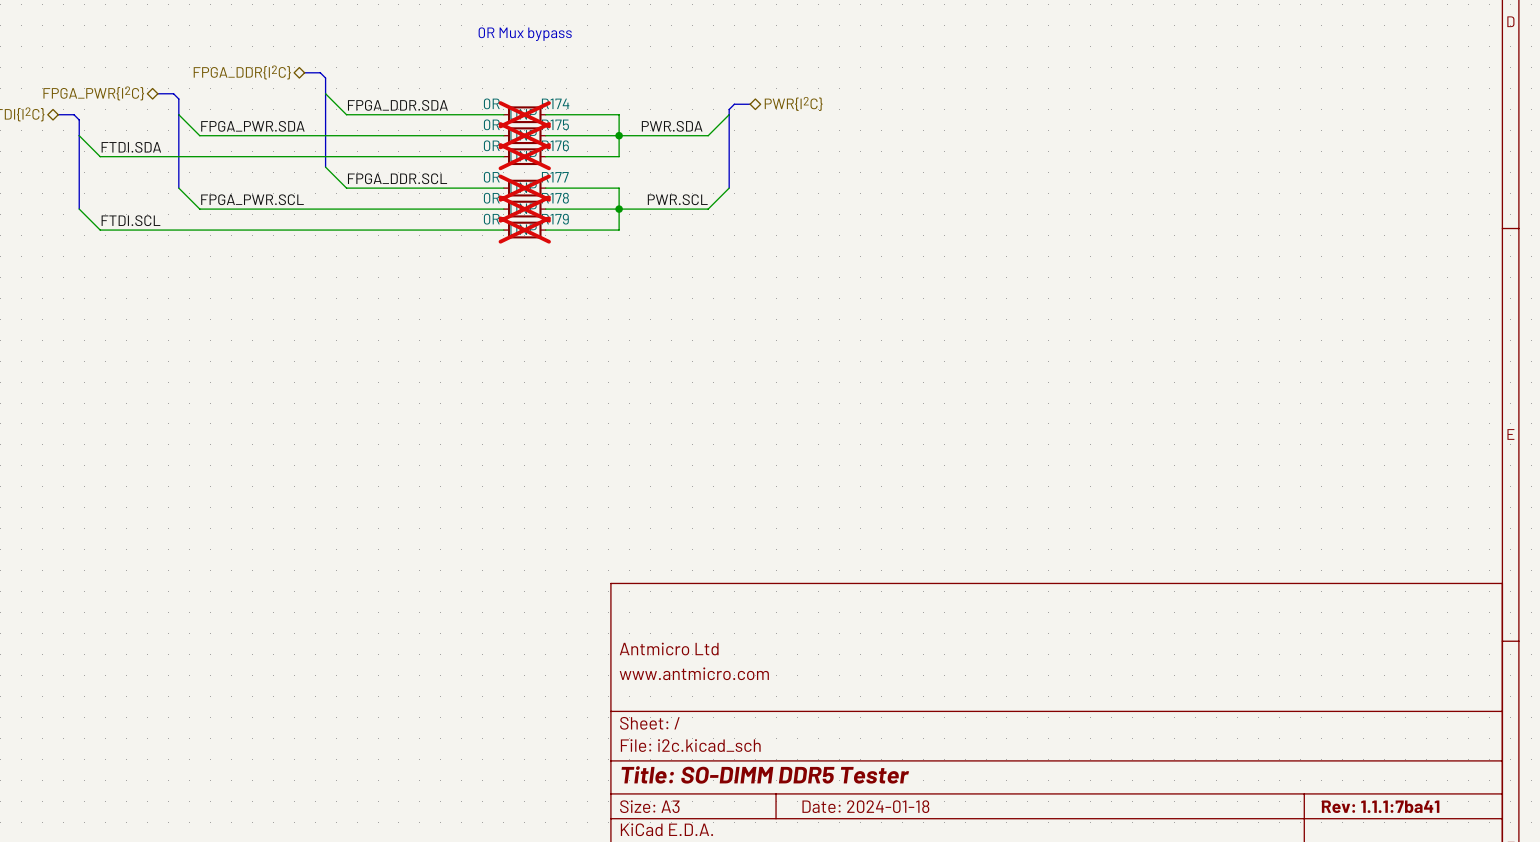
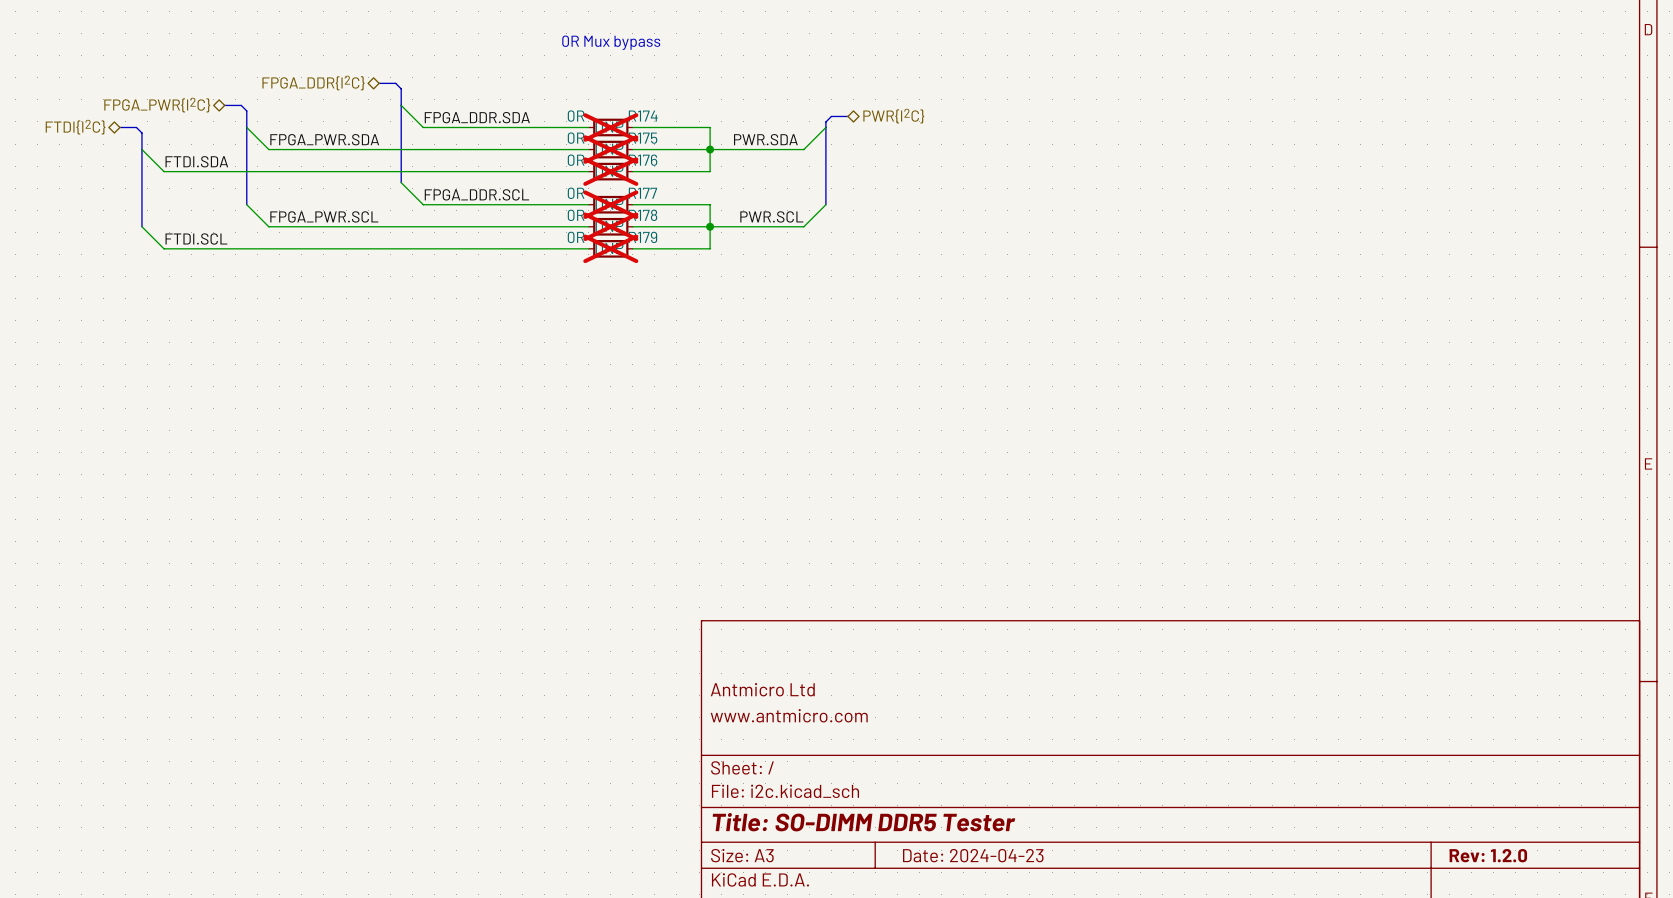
title block: Date: 2024-01-18 (865, 806) -> Date: 2024-04-23 (973, 855)
title block: Rev: 1.1.1:7ba41 (1380, 806) -> Rev: 1.2.0 (1488, 855)

